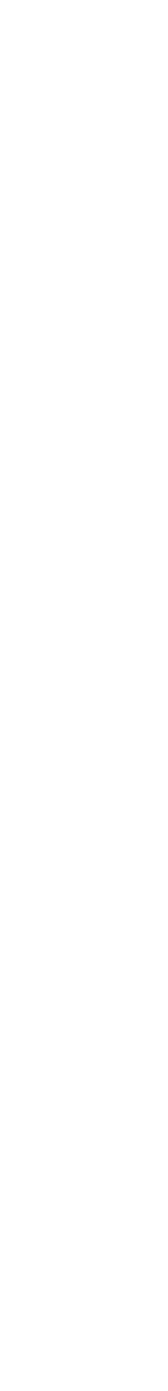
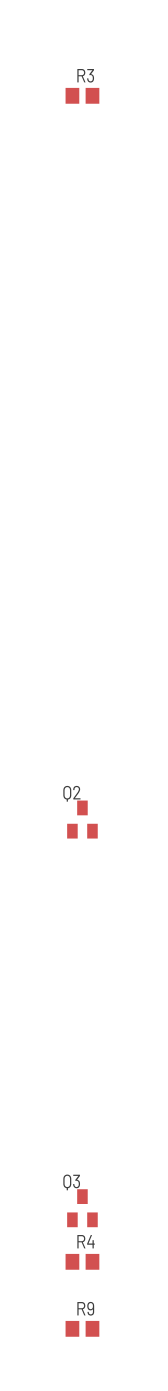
R3: none -> (82, 95)
Q2: none -> (82, 819)
Q3: none -> (82, 1208)
R4: none -> (82, 1261)
R9: none -> (82, 1328)

